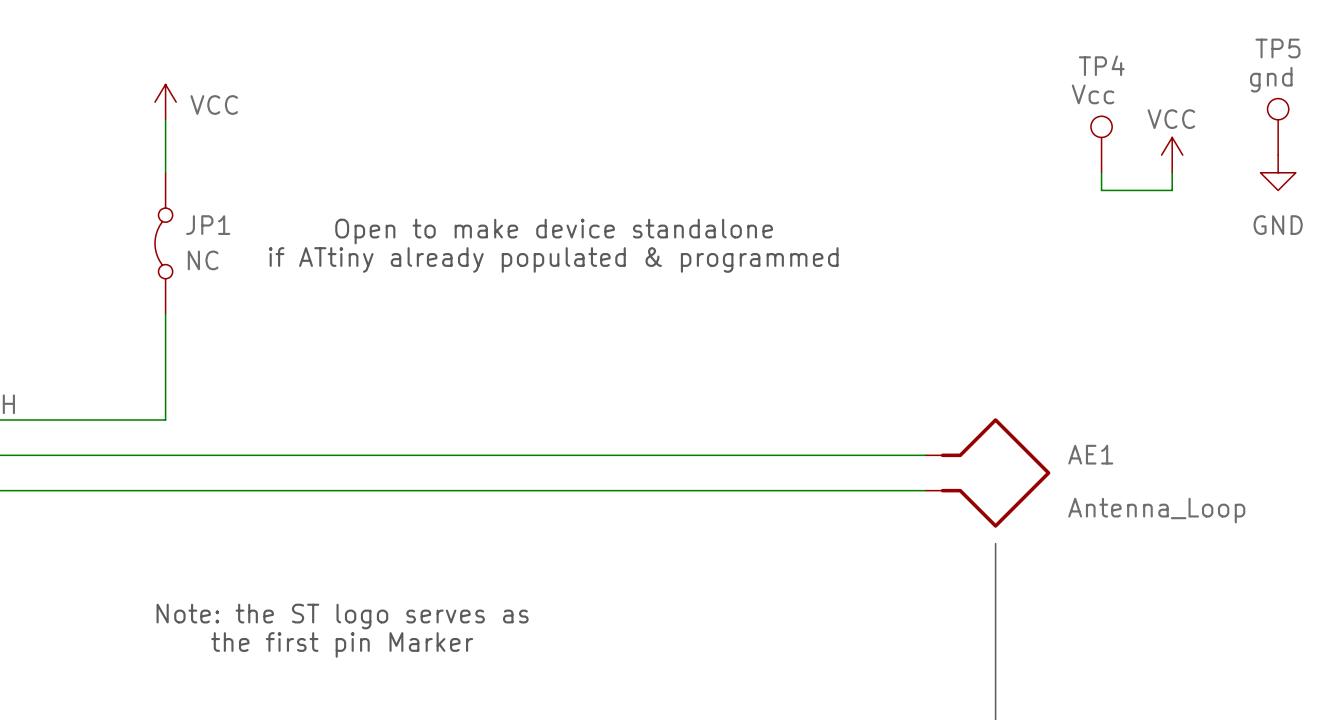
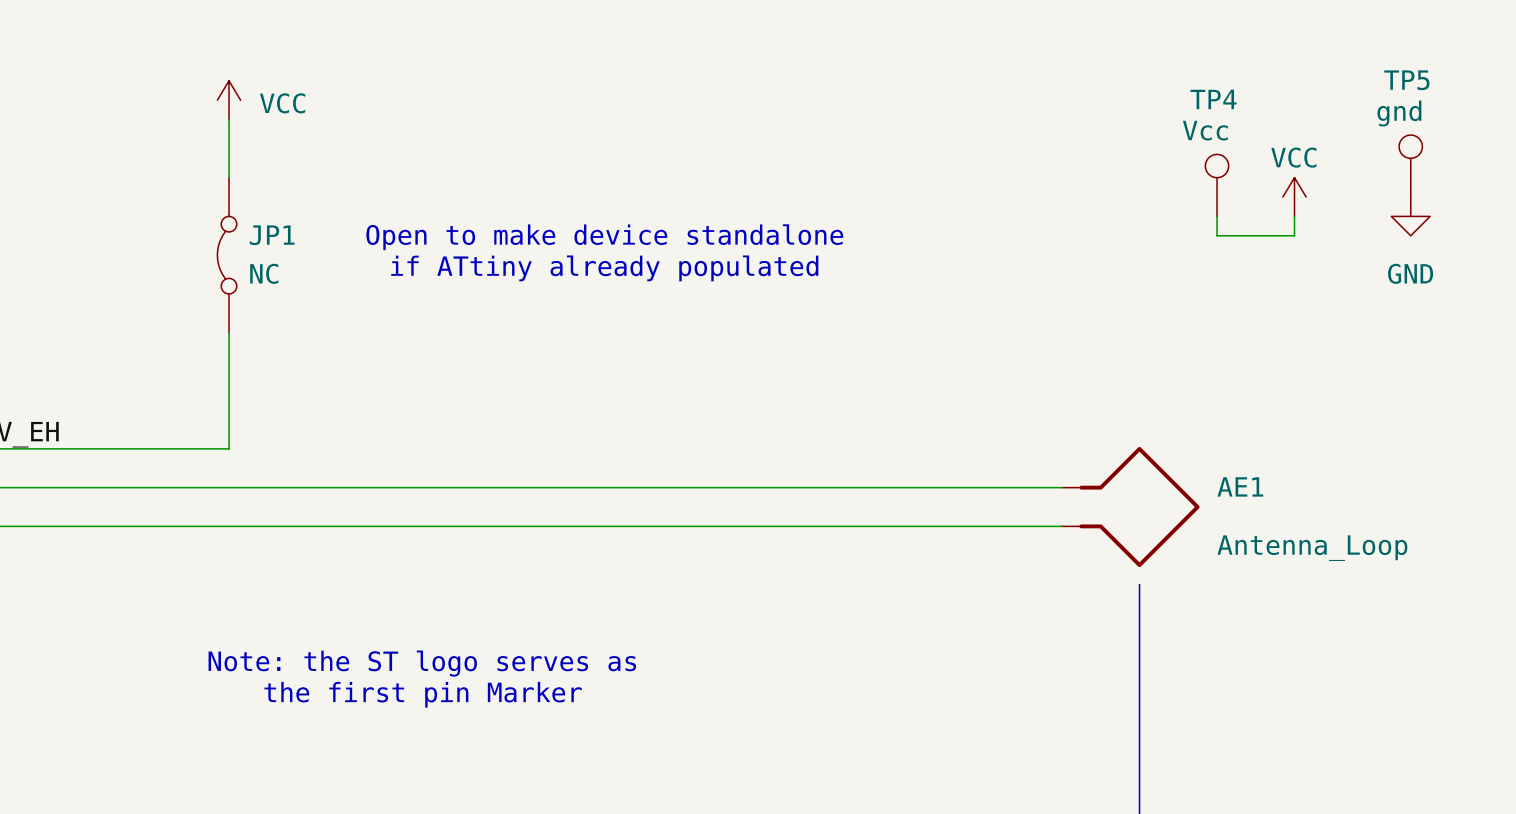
TP5 position: (1278, 126) -> (1410, 166)
TP4 position: (1101, 144) -> (1217, 185)
power symbol position: VCC (1172, 155) -> VCC (1294, 197)
wire: (1101, 172) (1101, 190) (1172, 190) (1172, 172) -> (1217, 216) (1217, 235) (1294, 235) (1294, 216)
power symbol position: GND (1278, 172) -> GND (1410, 216)
text position: Open to make device standalone (554, 231) -> Open to make device standalone (604, 237)
text: if ATtiny already populated & programmed (553, 259) -> if ATtiny already populated (604, 268)

